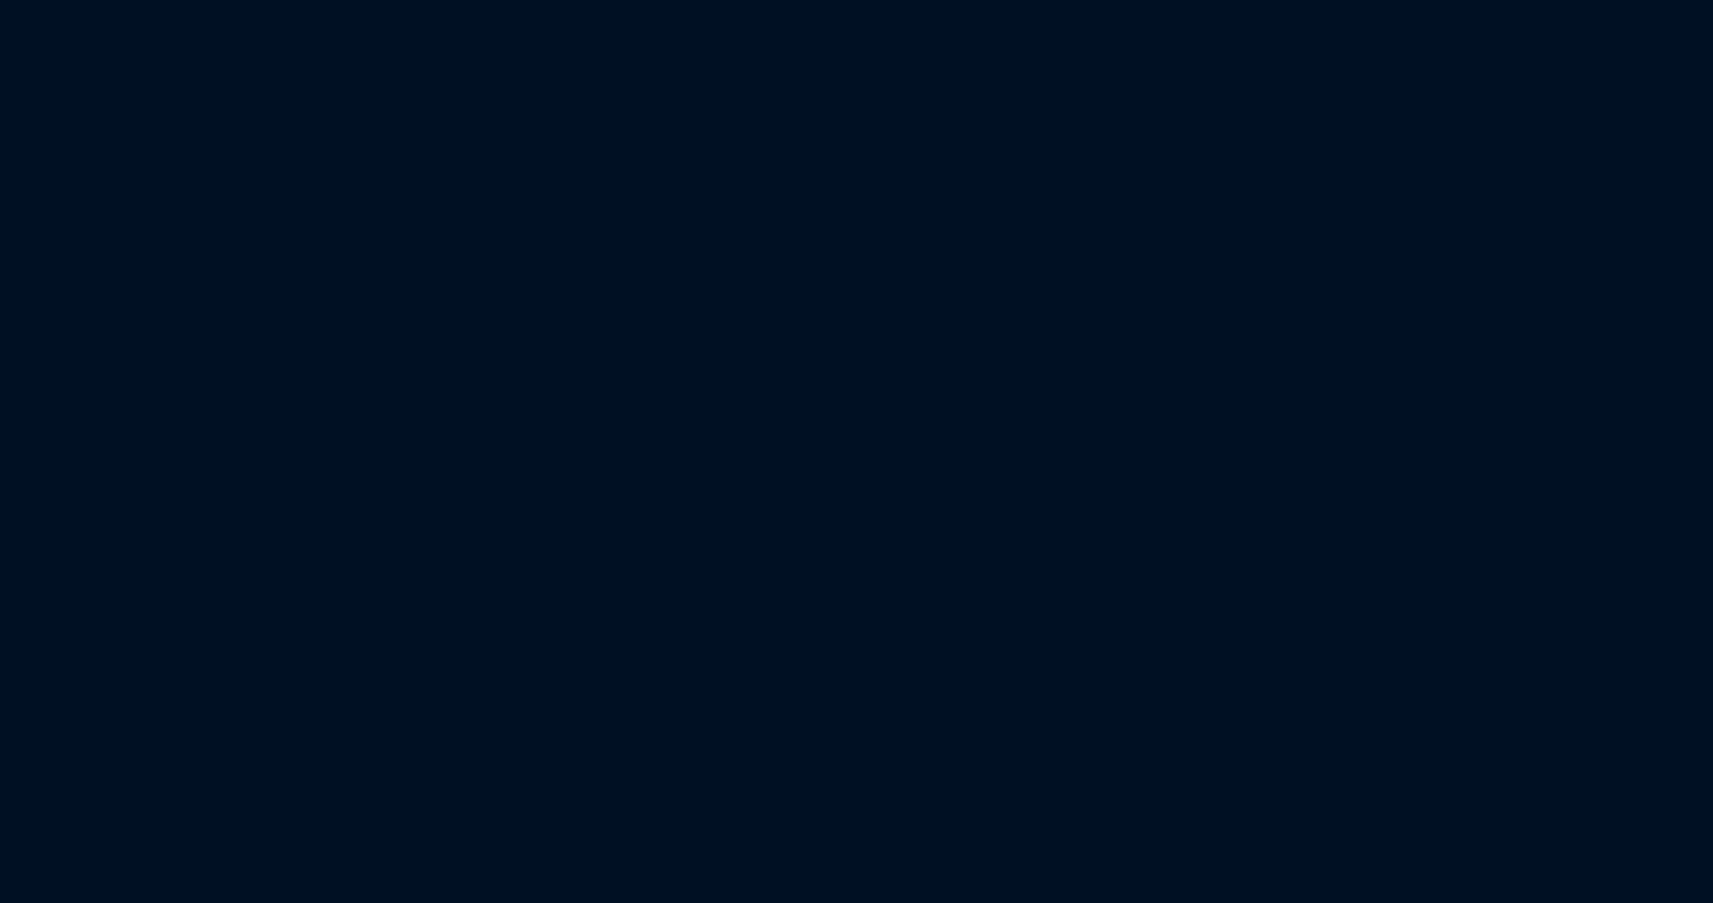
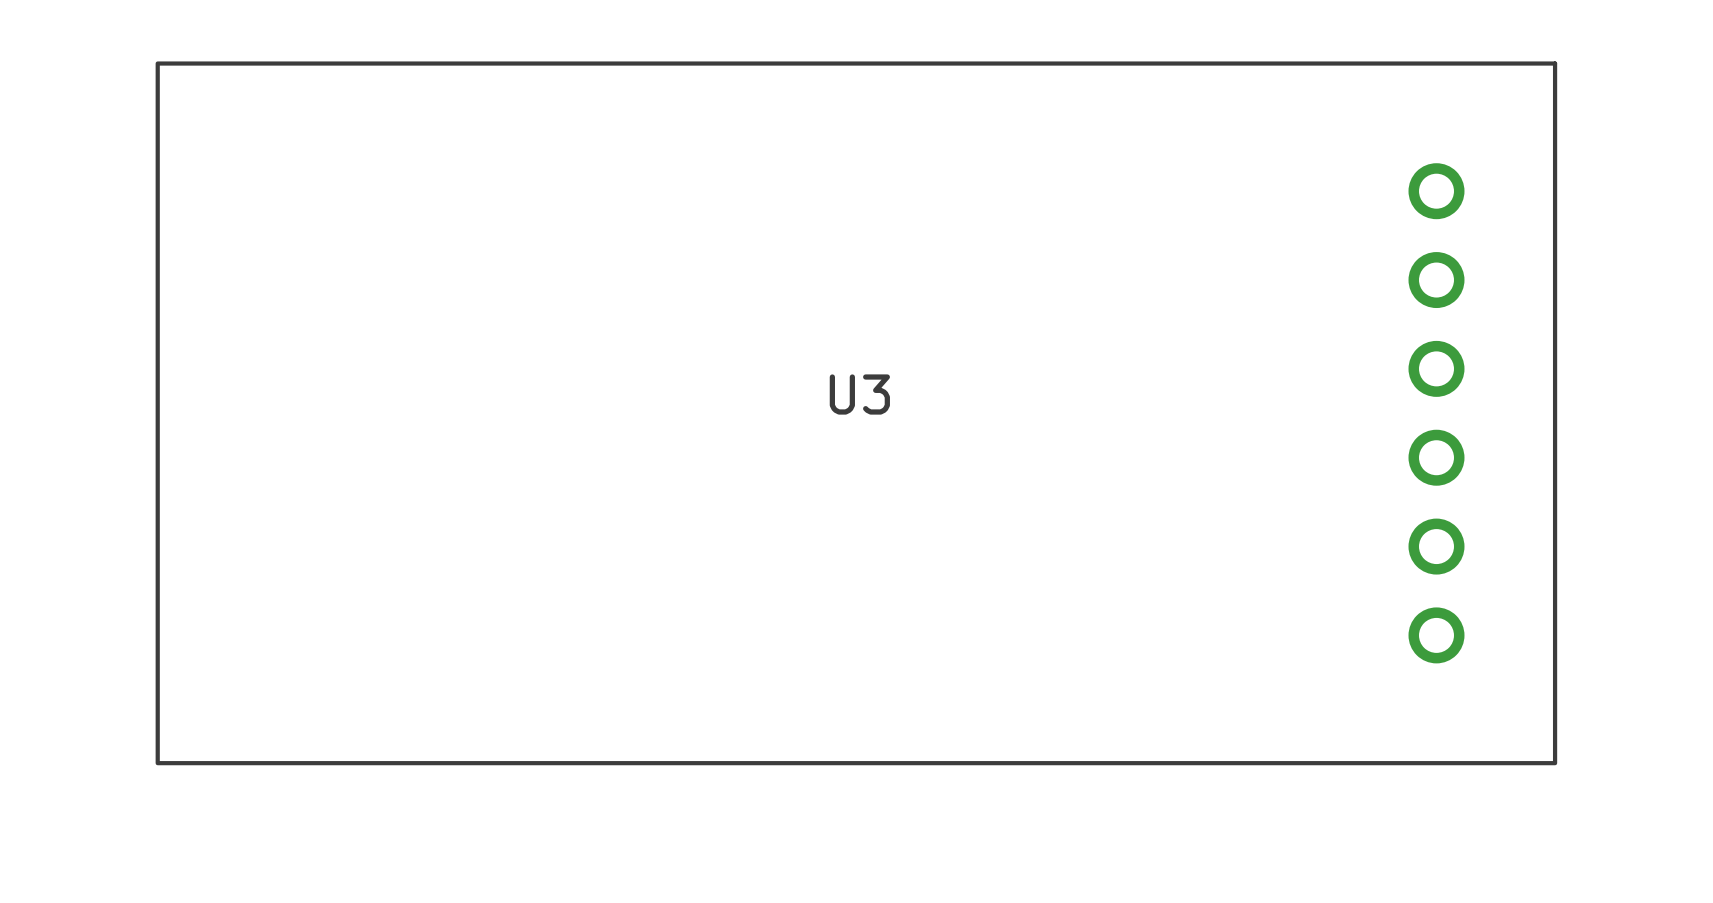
U3: none -> (856, 413)

